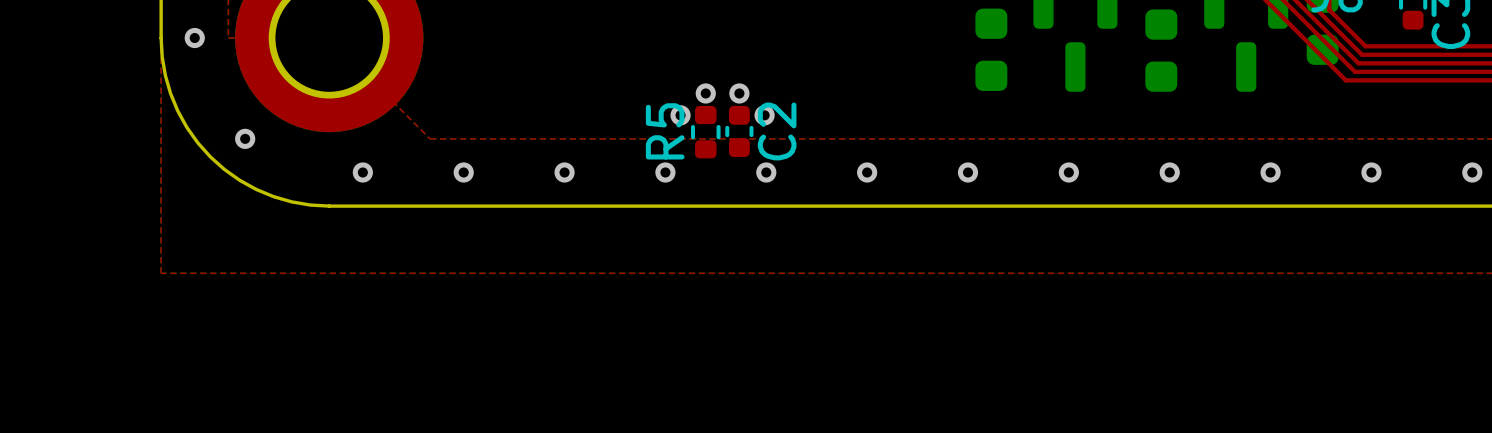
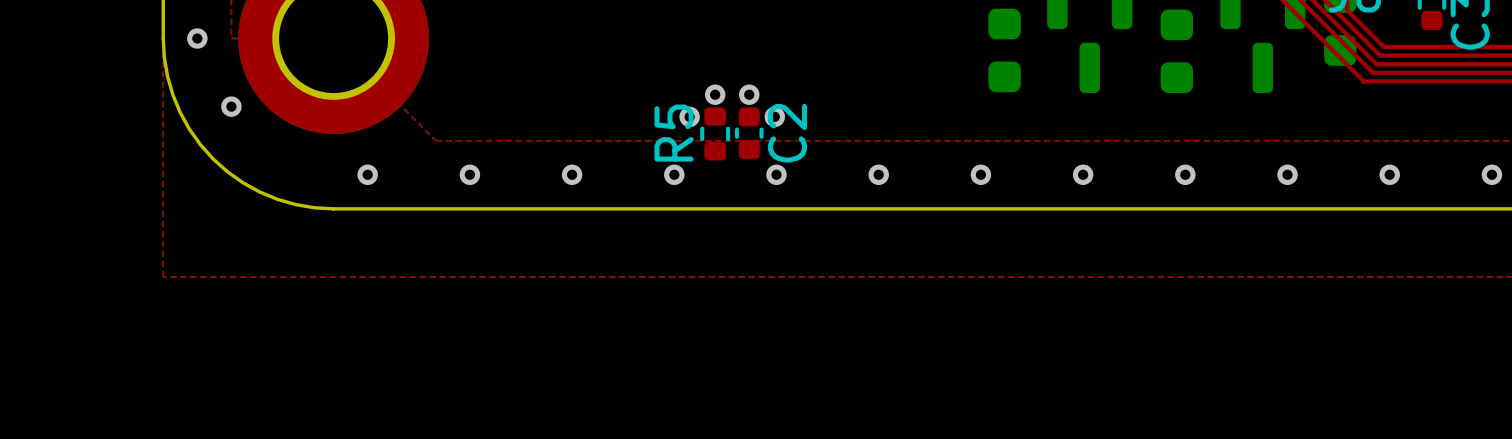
via position: (245, 138) -> (231, 106)

